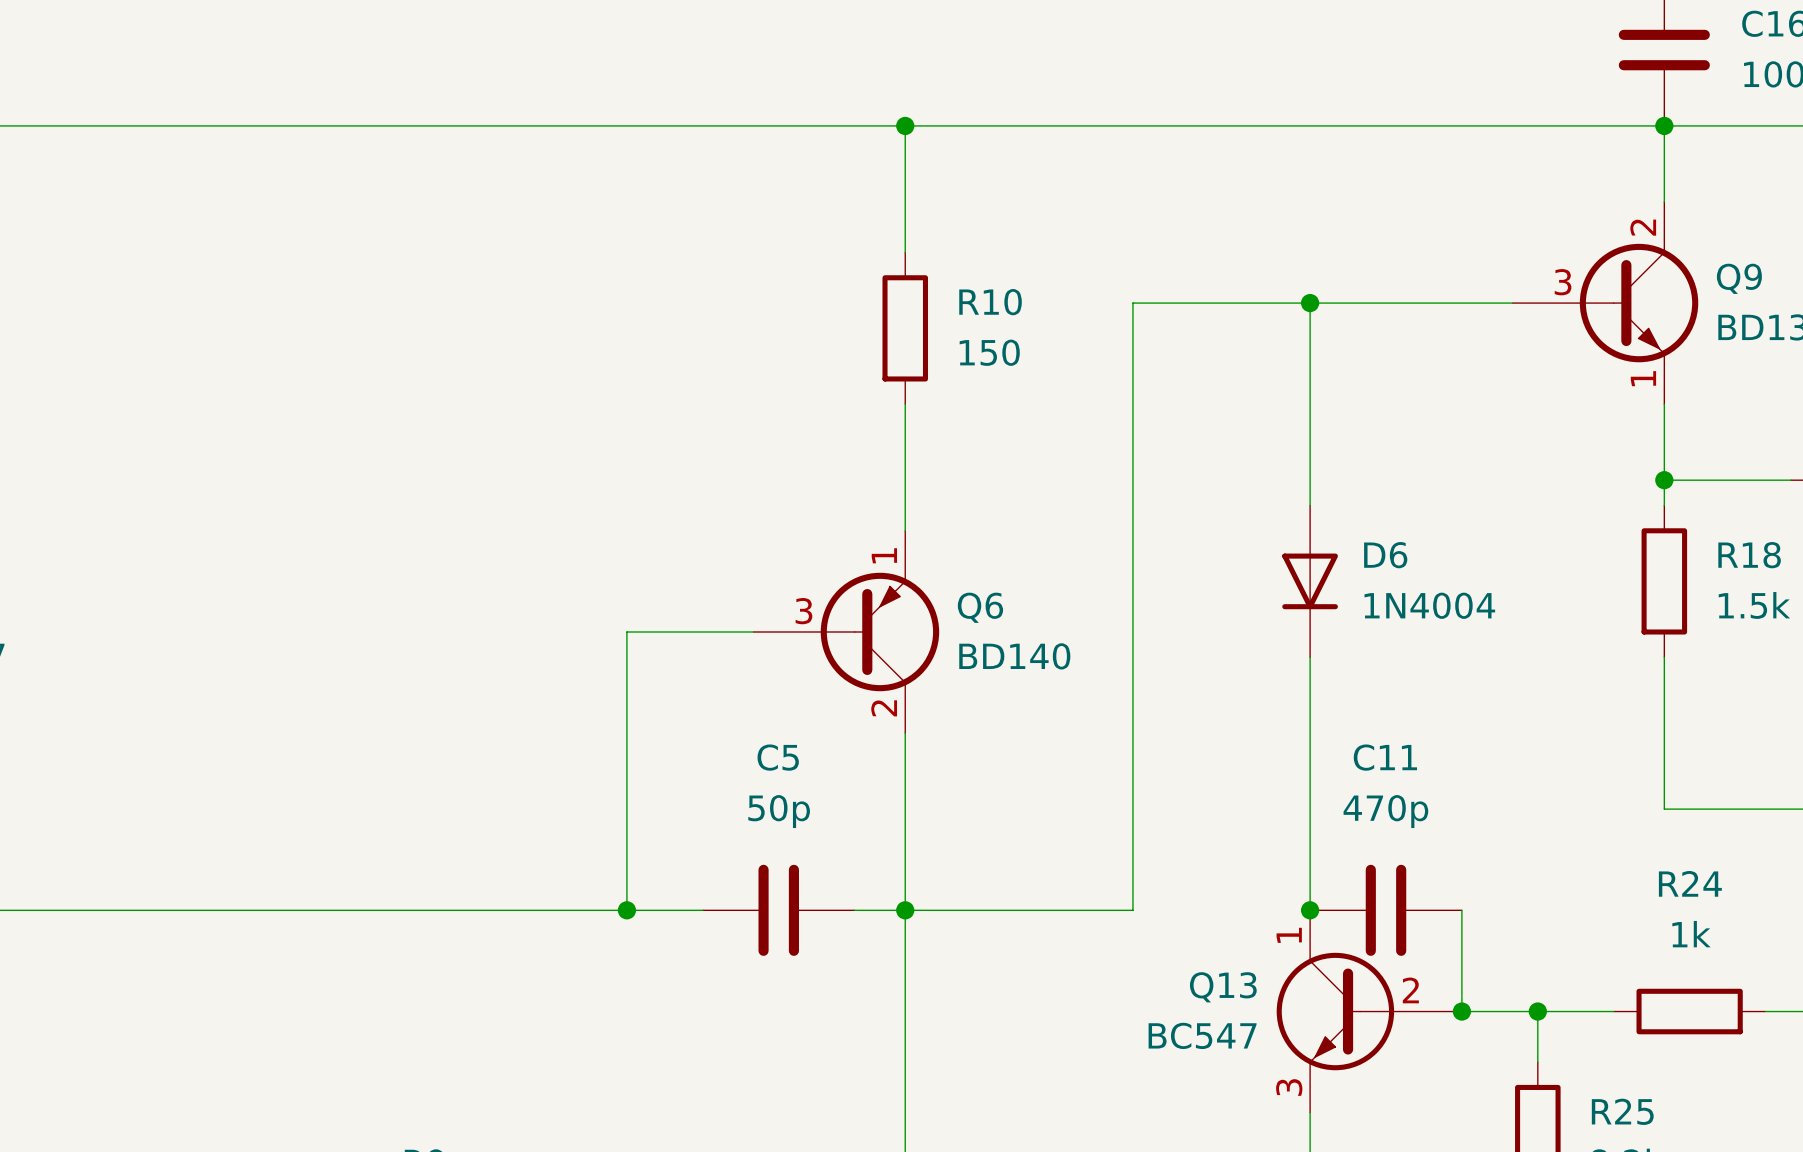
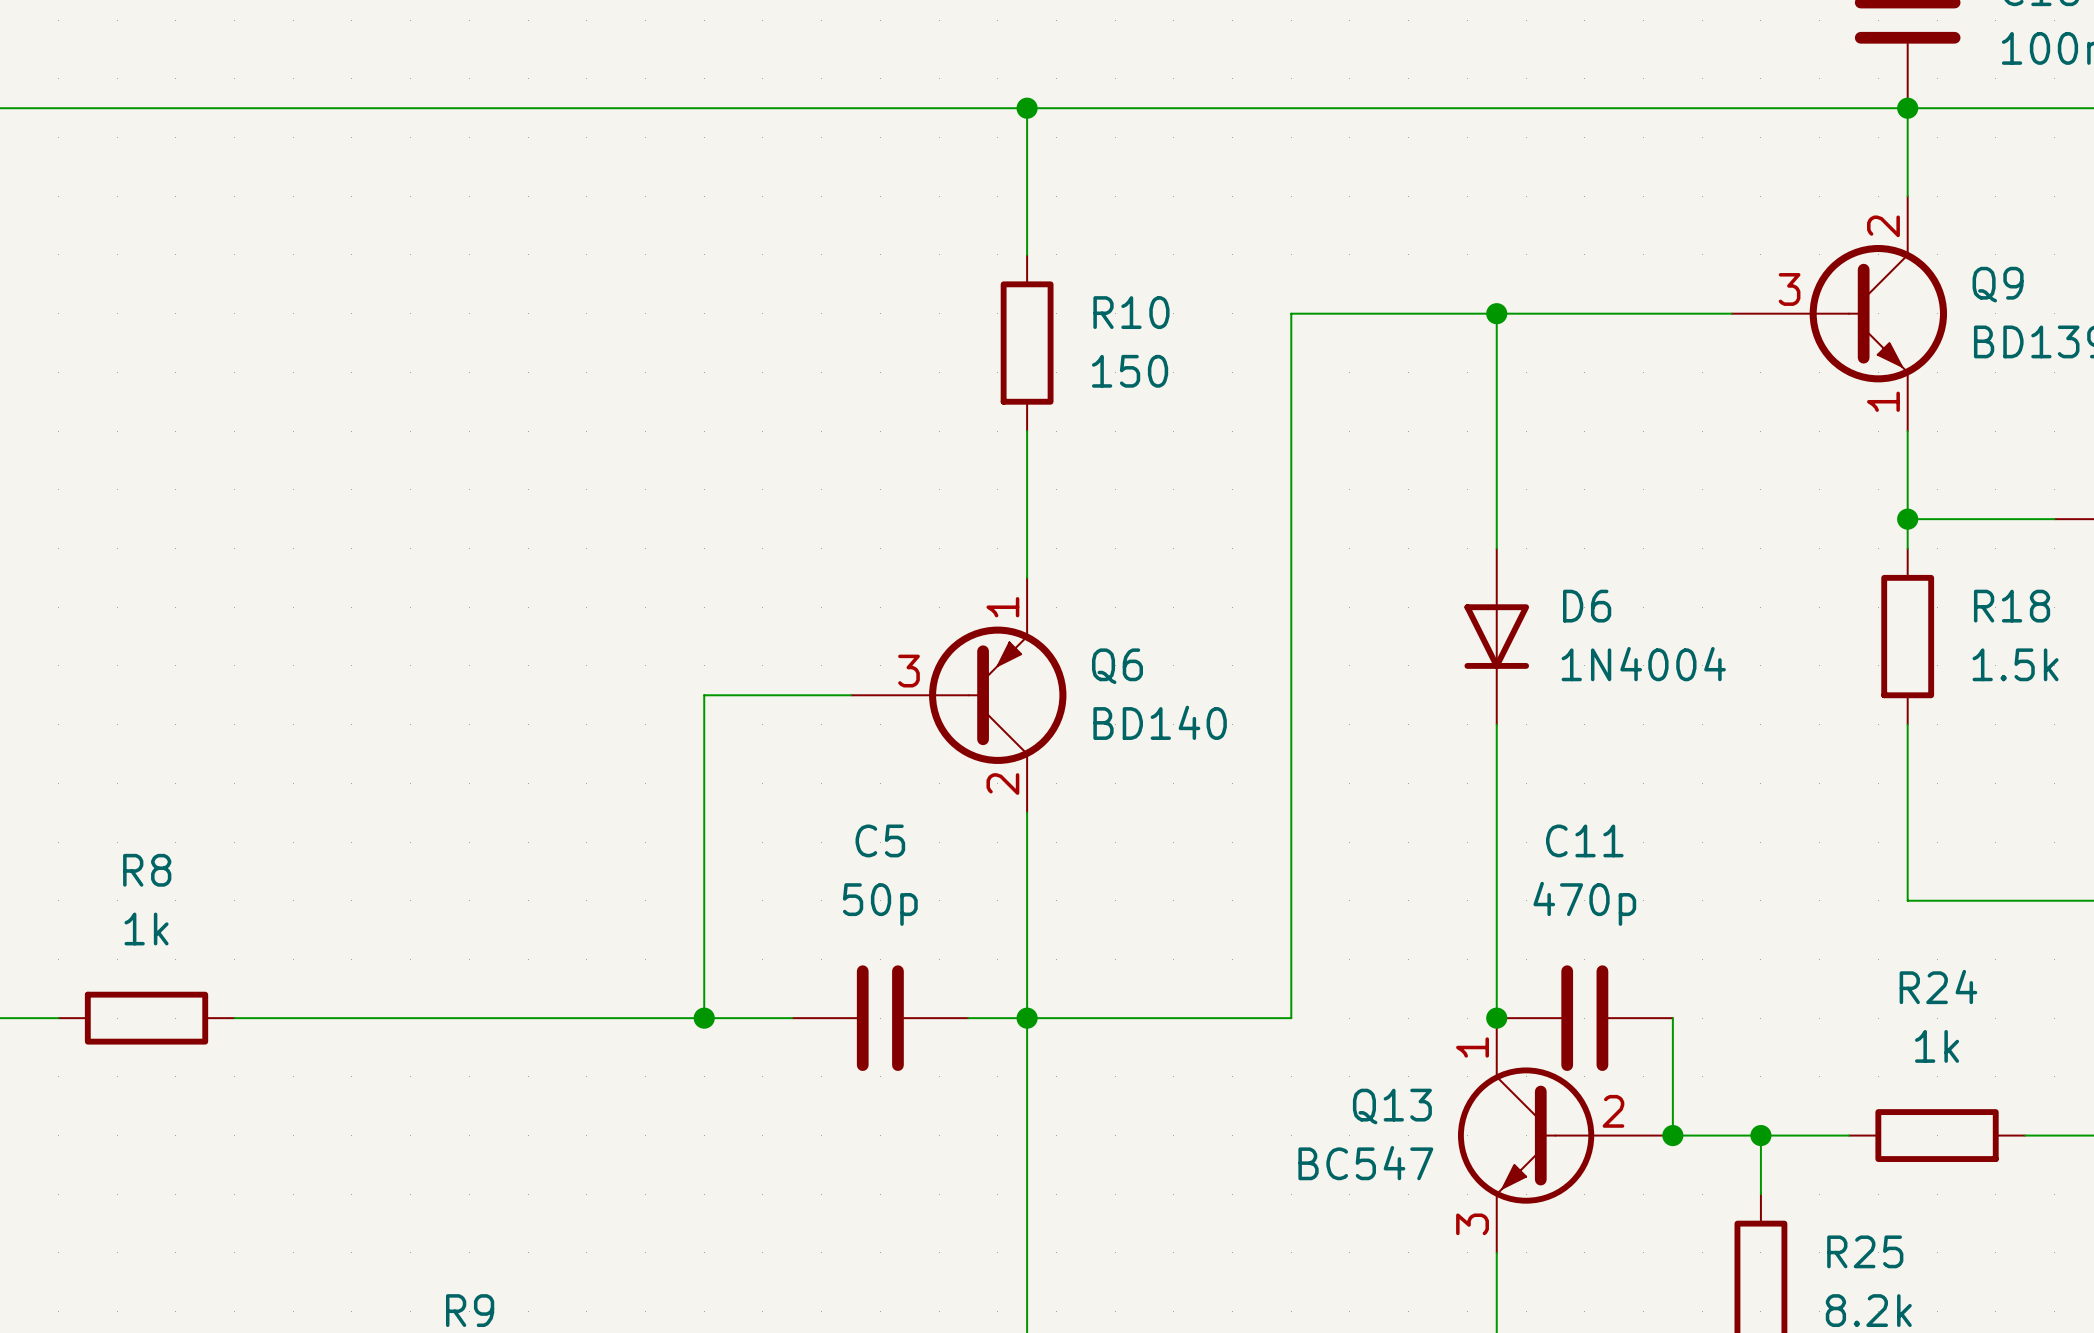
wire: (70, 910) (222, 910) -> none
R8: none -> 1k (146, 1018)

